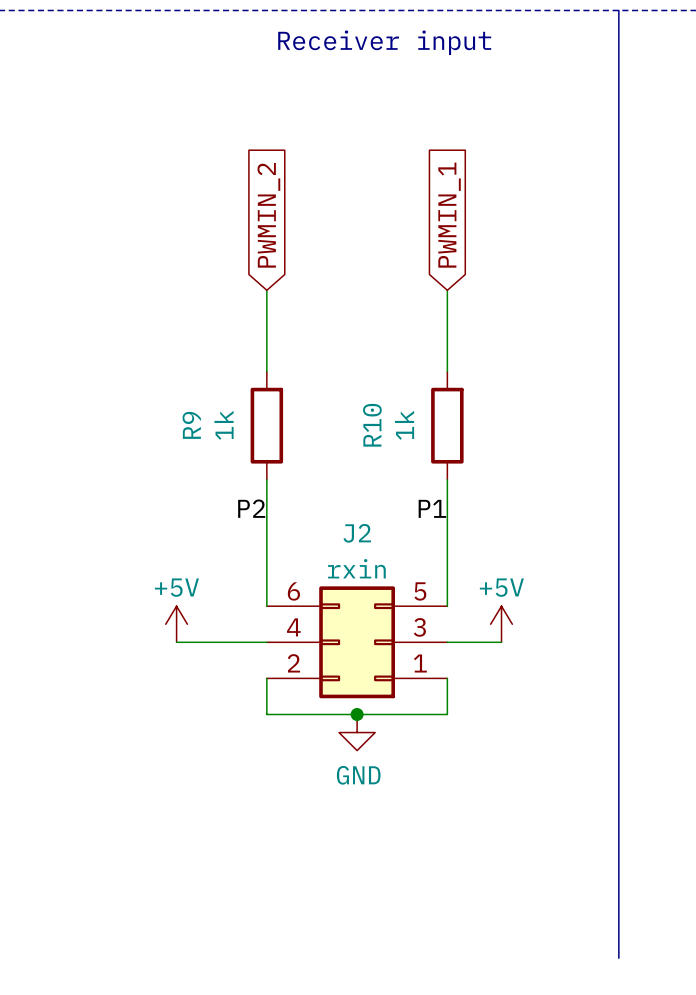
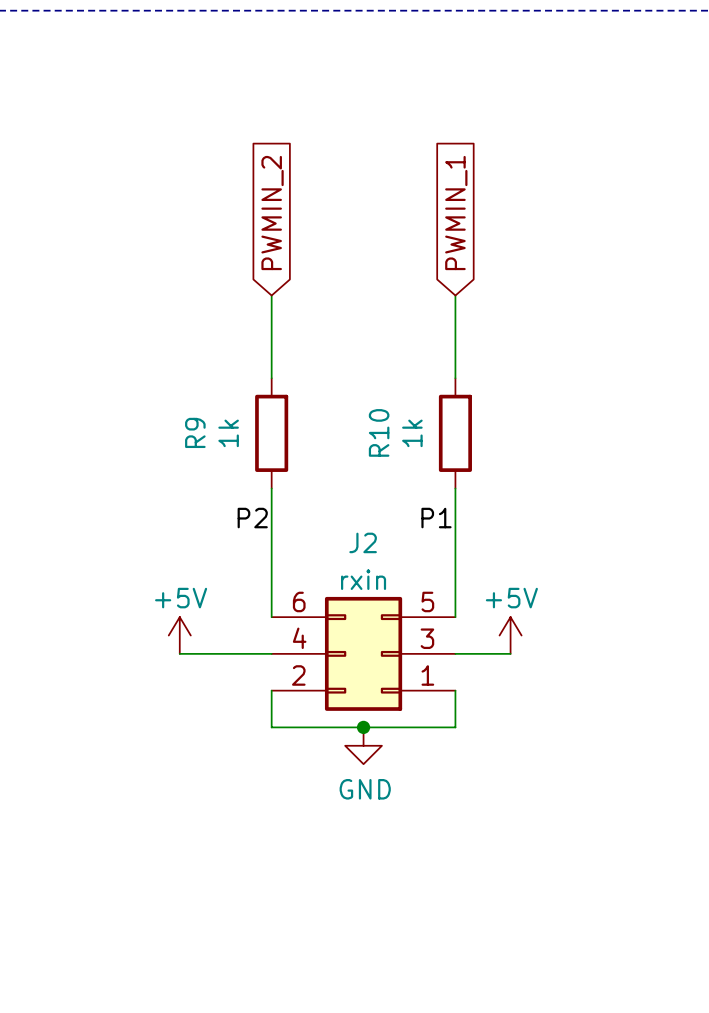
line: (618, 10) (618, 958) -> none
text: Receiver input (384, 42) -> none

